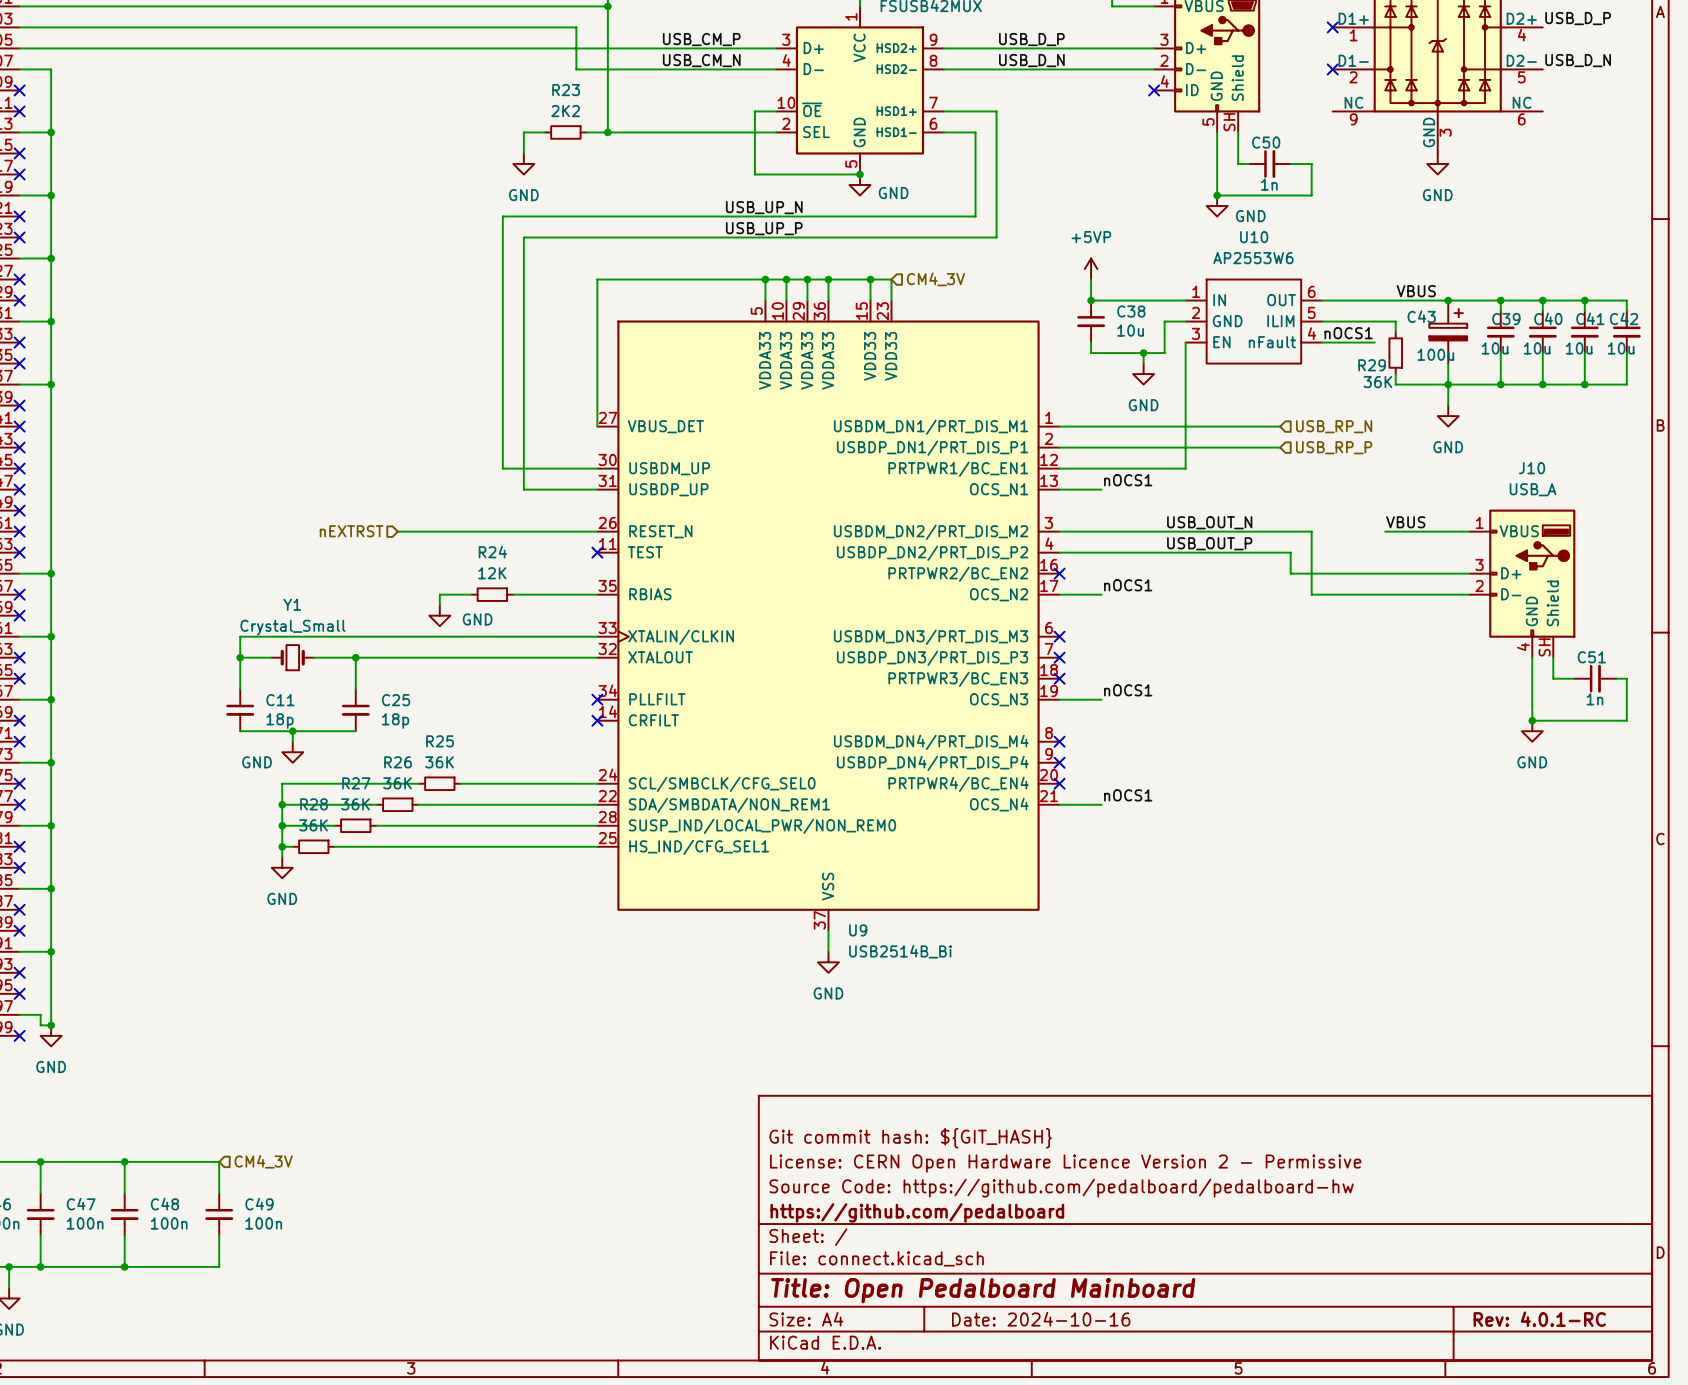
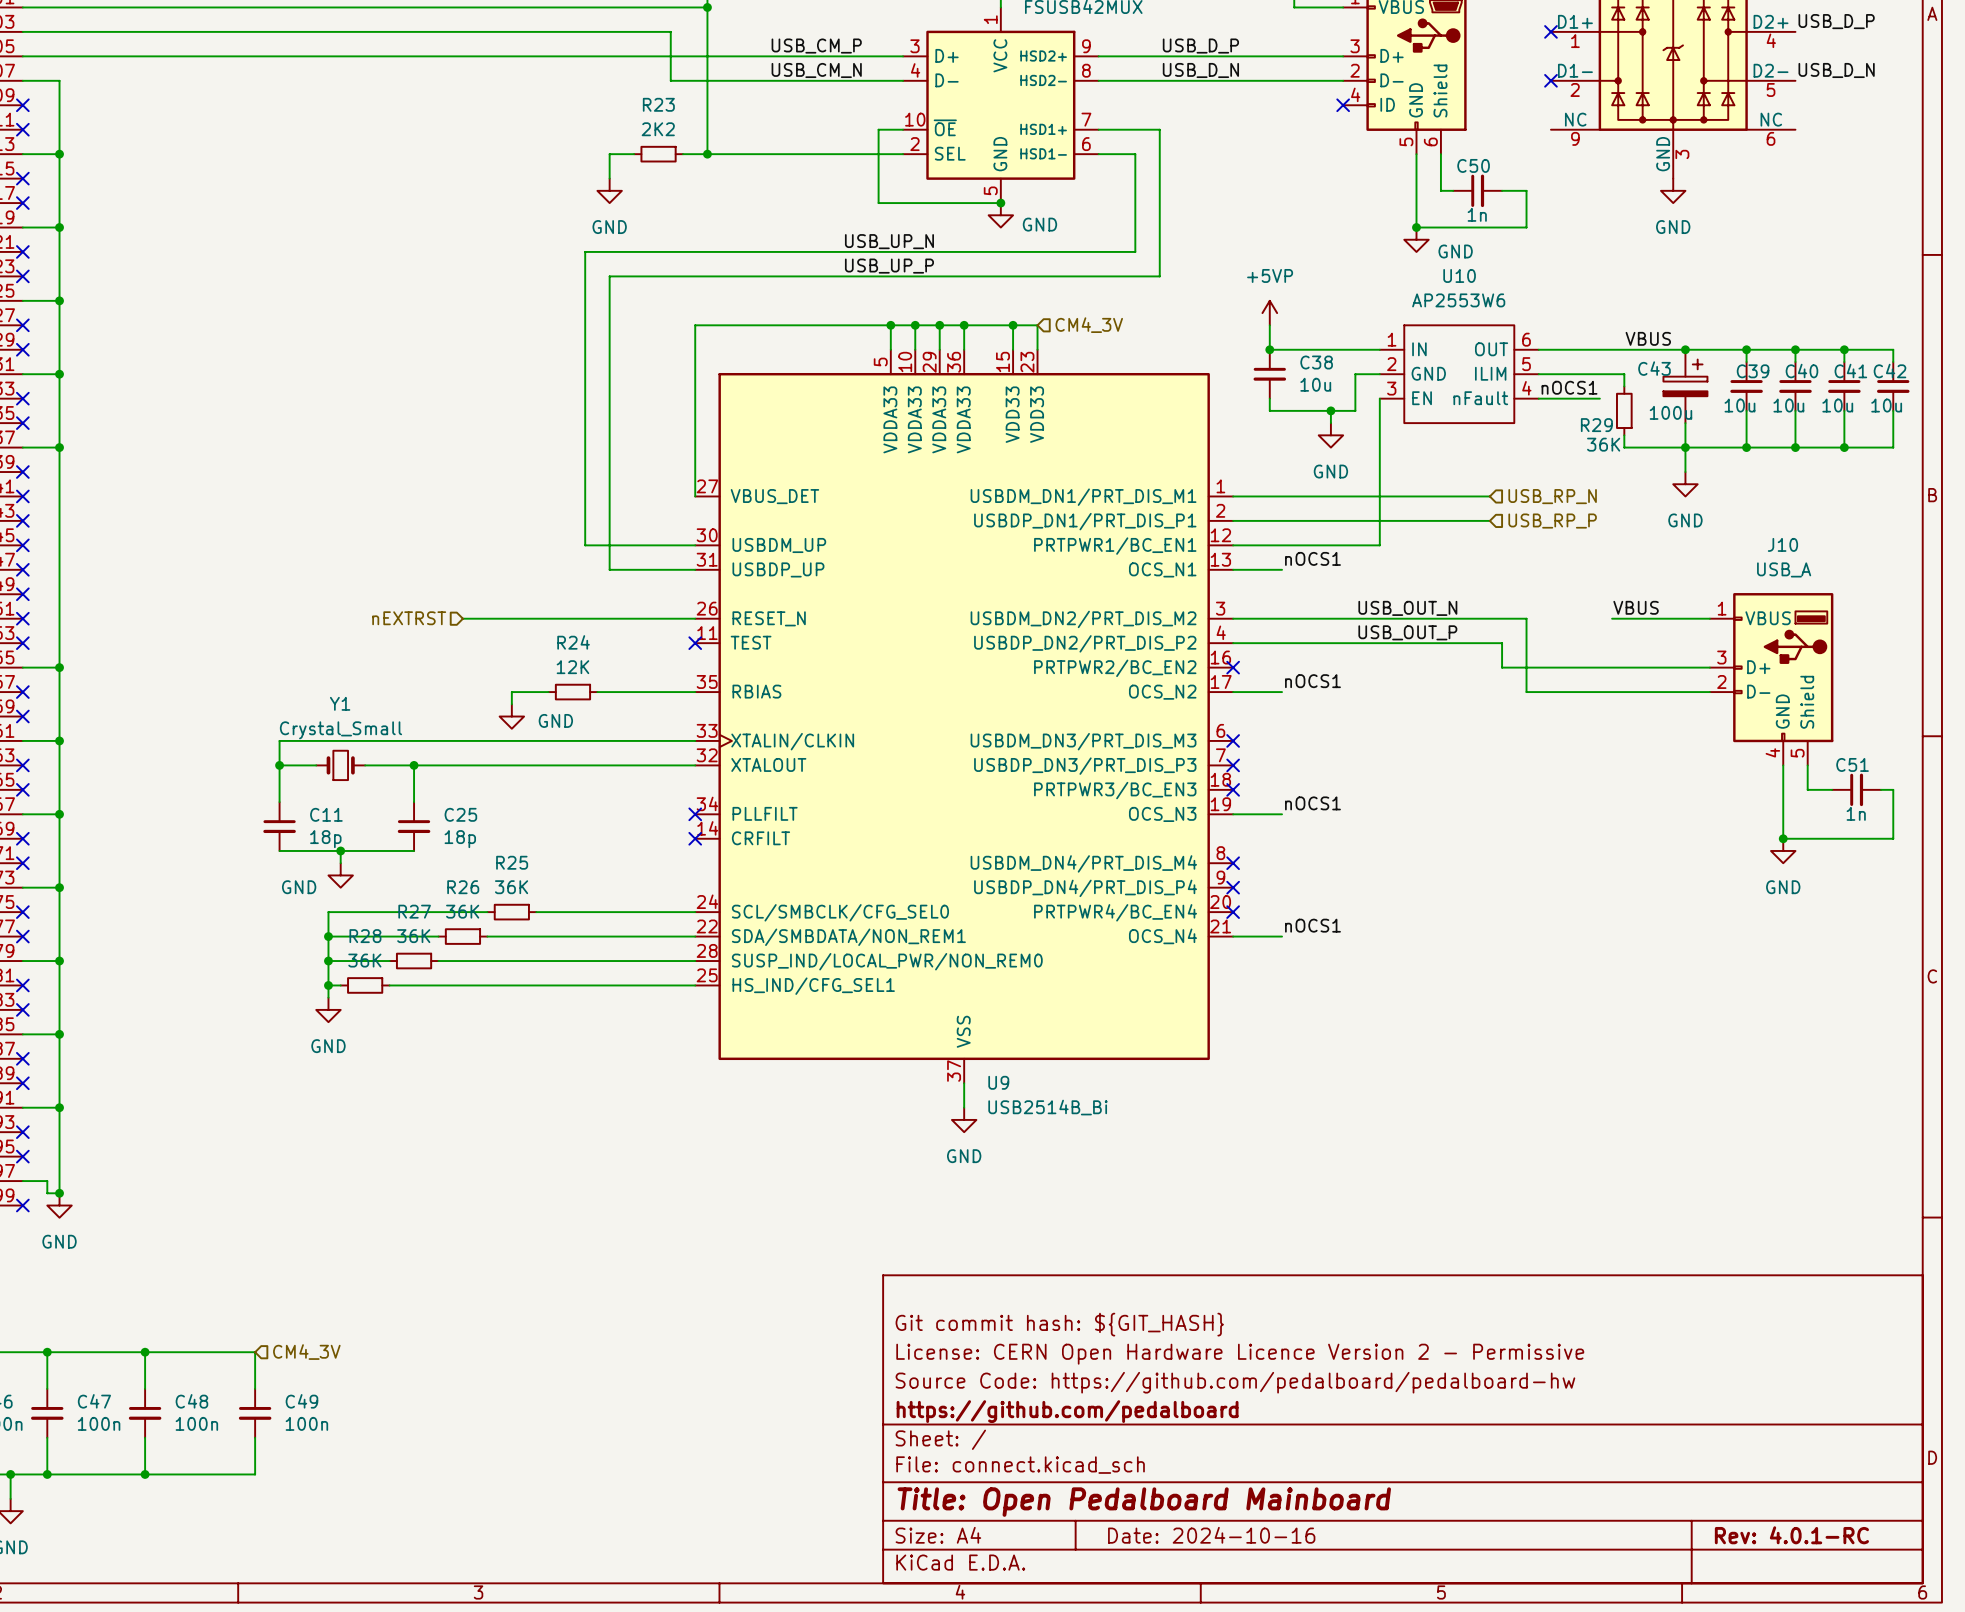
part pin number: SH (1229, 122) -> 6 (1430, 141)
J10 pin number: SH (1544, 647) -> 5 (1797, 753)

